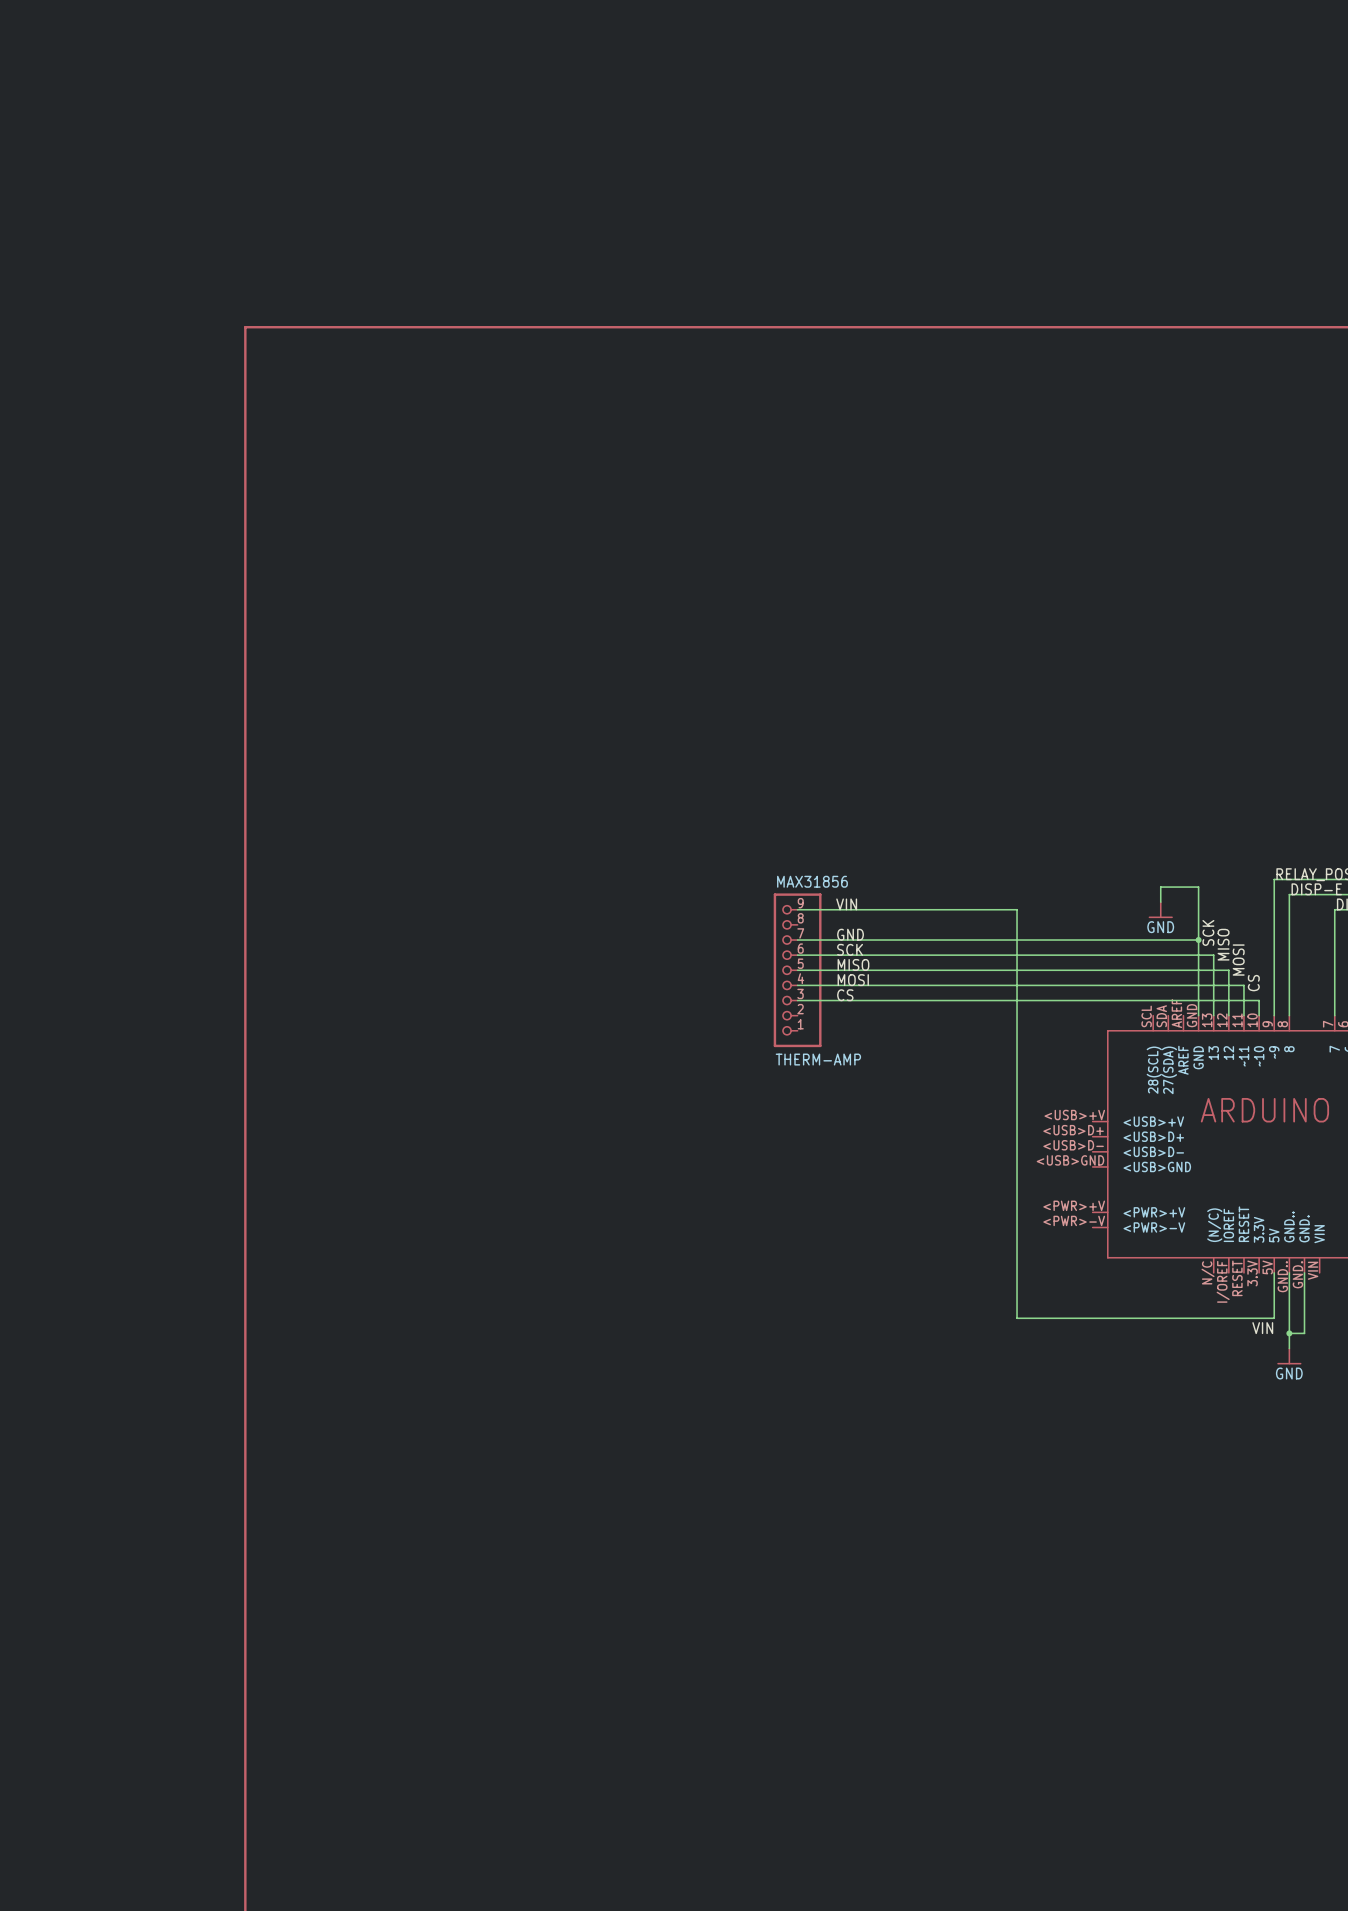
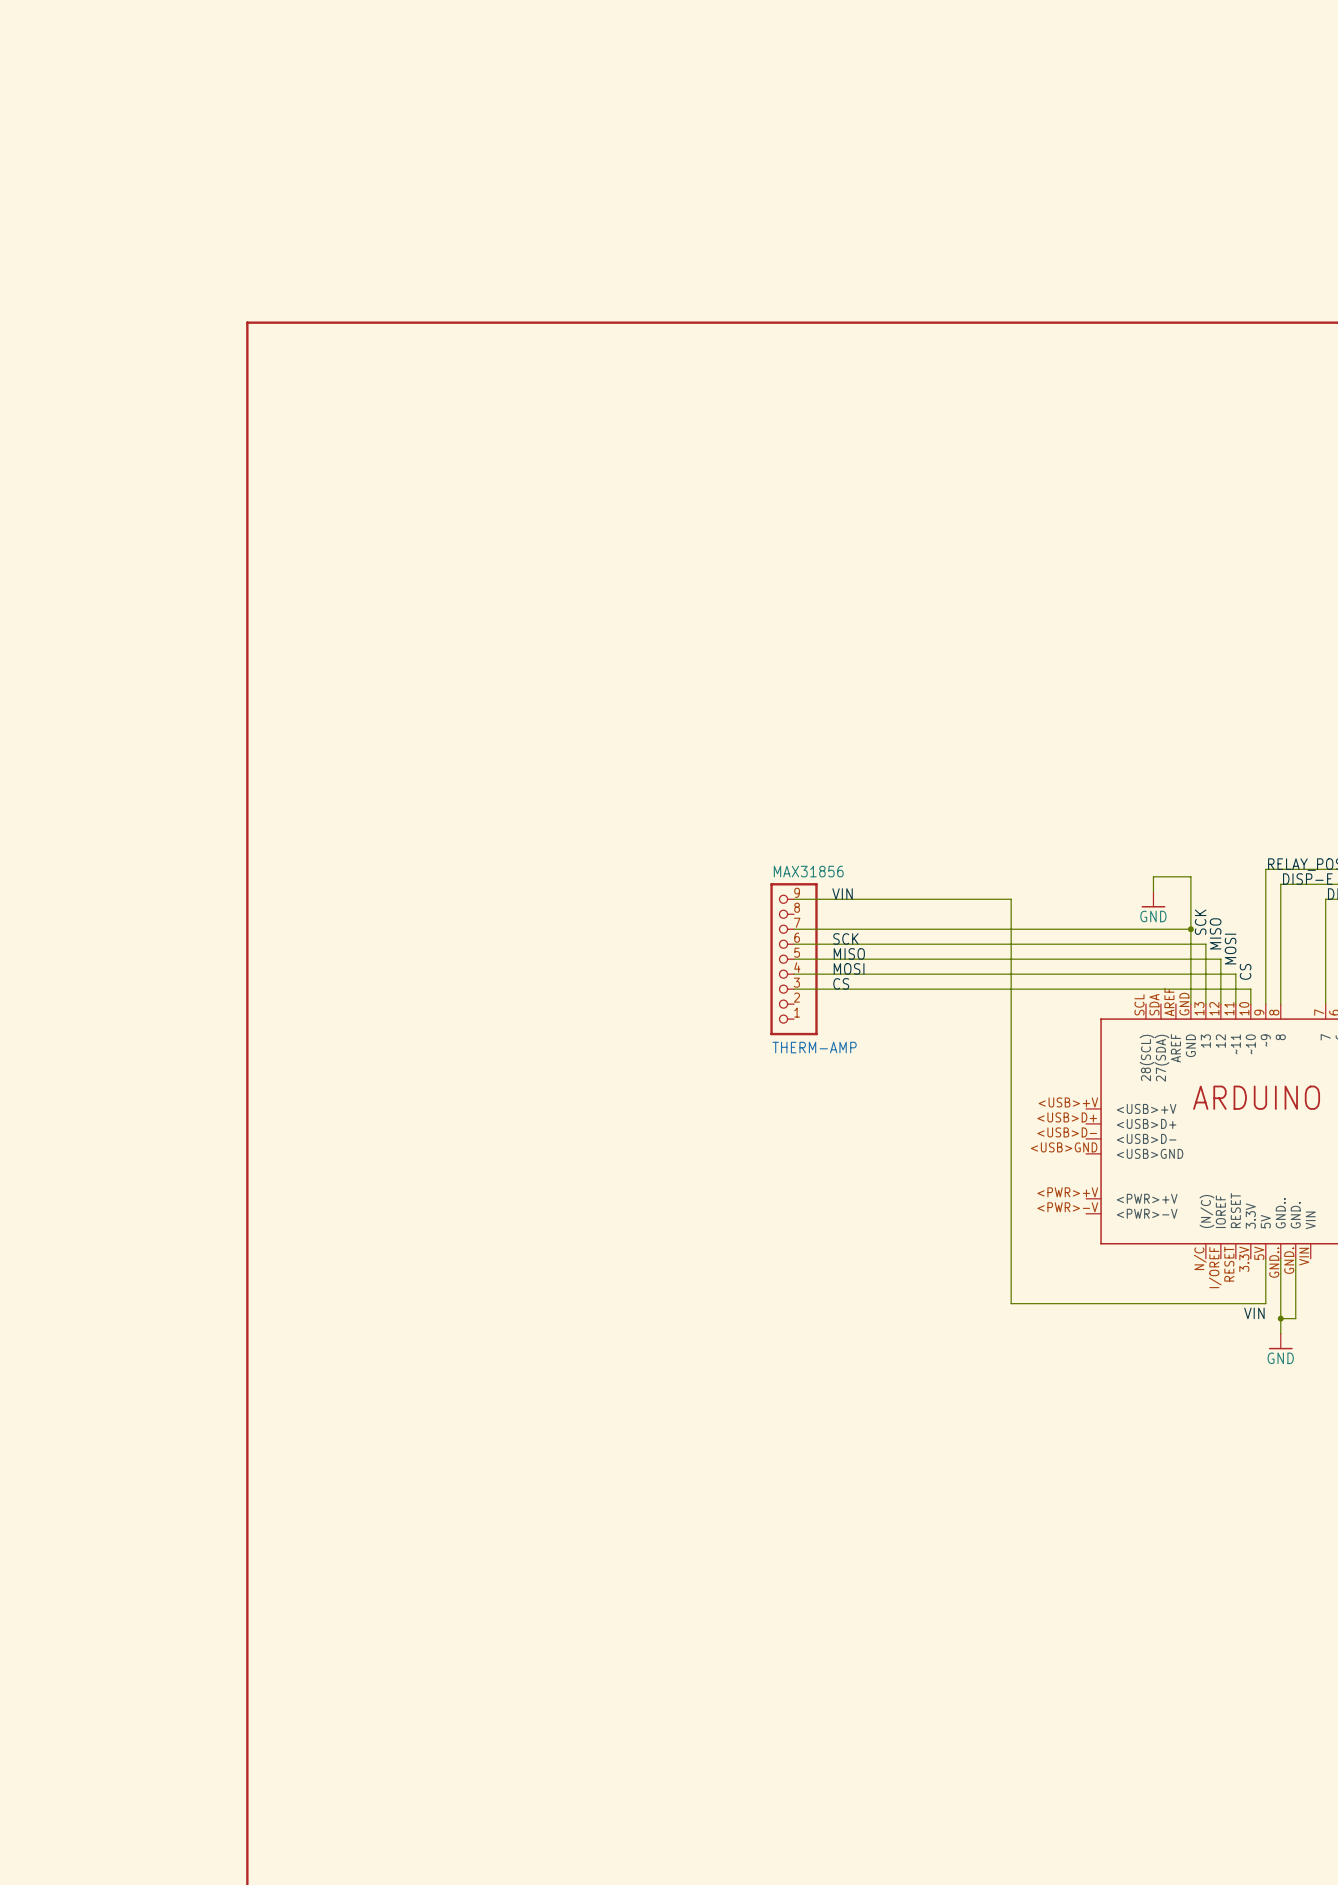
label: GND (850, 934) -> none

